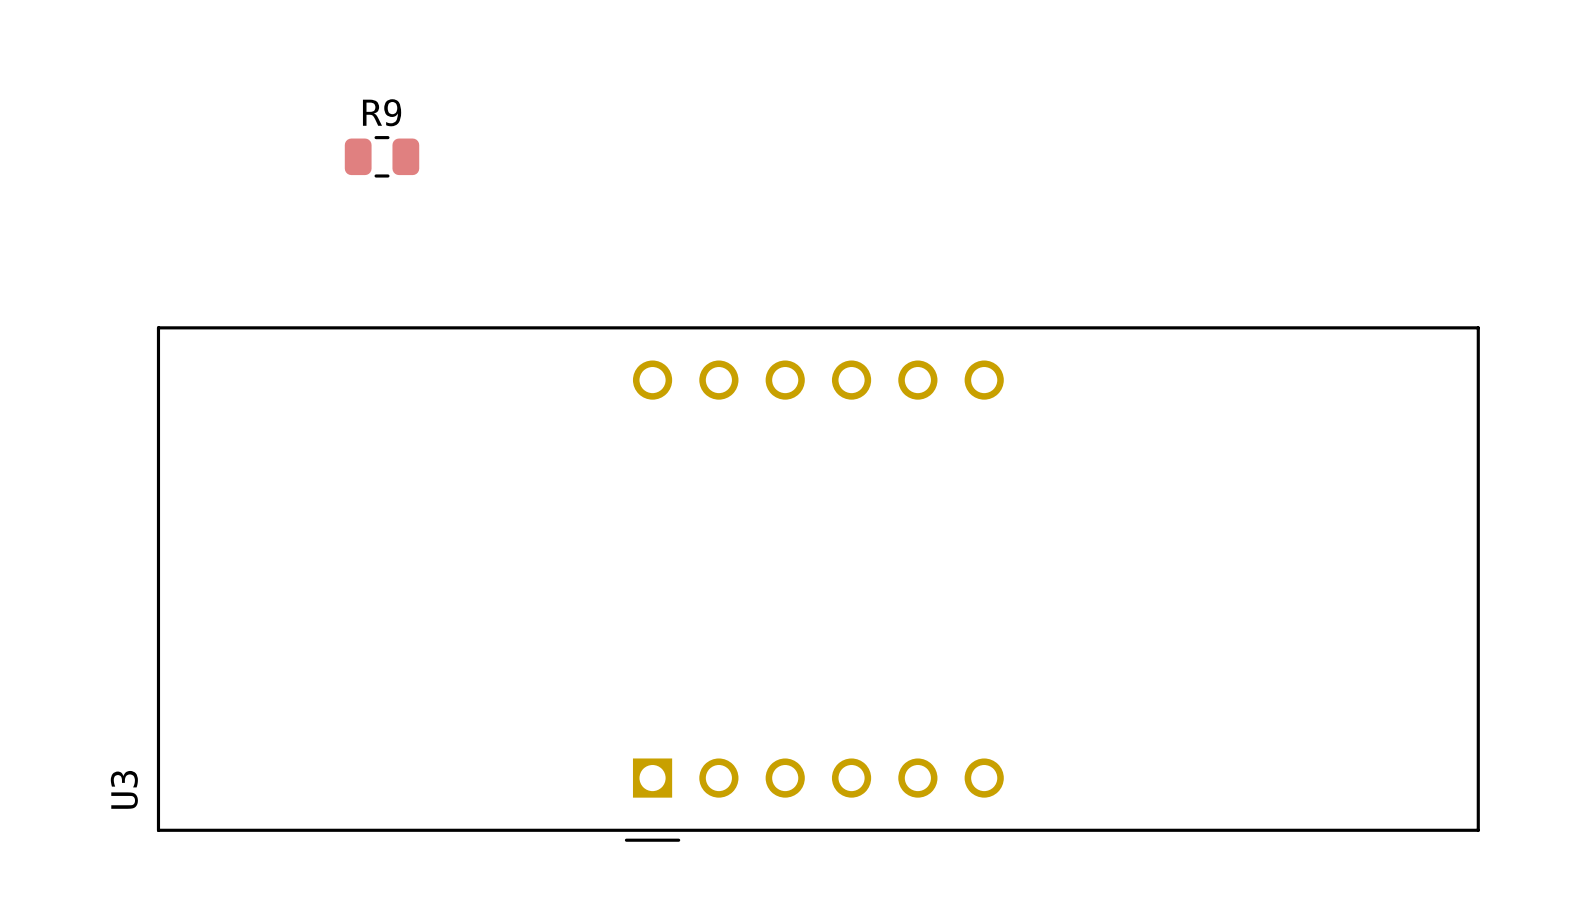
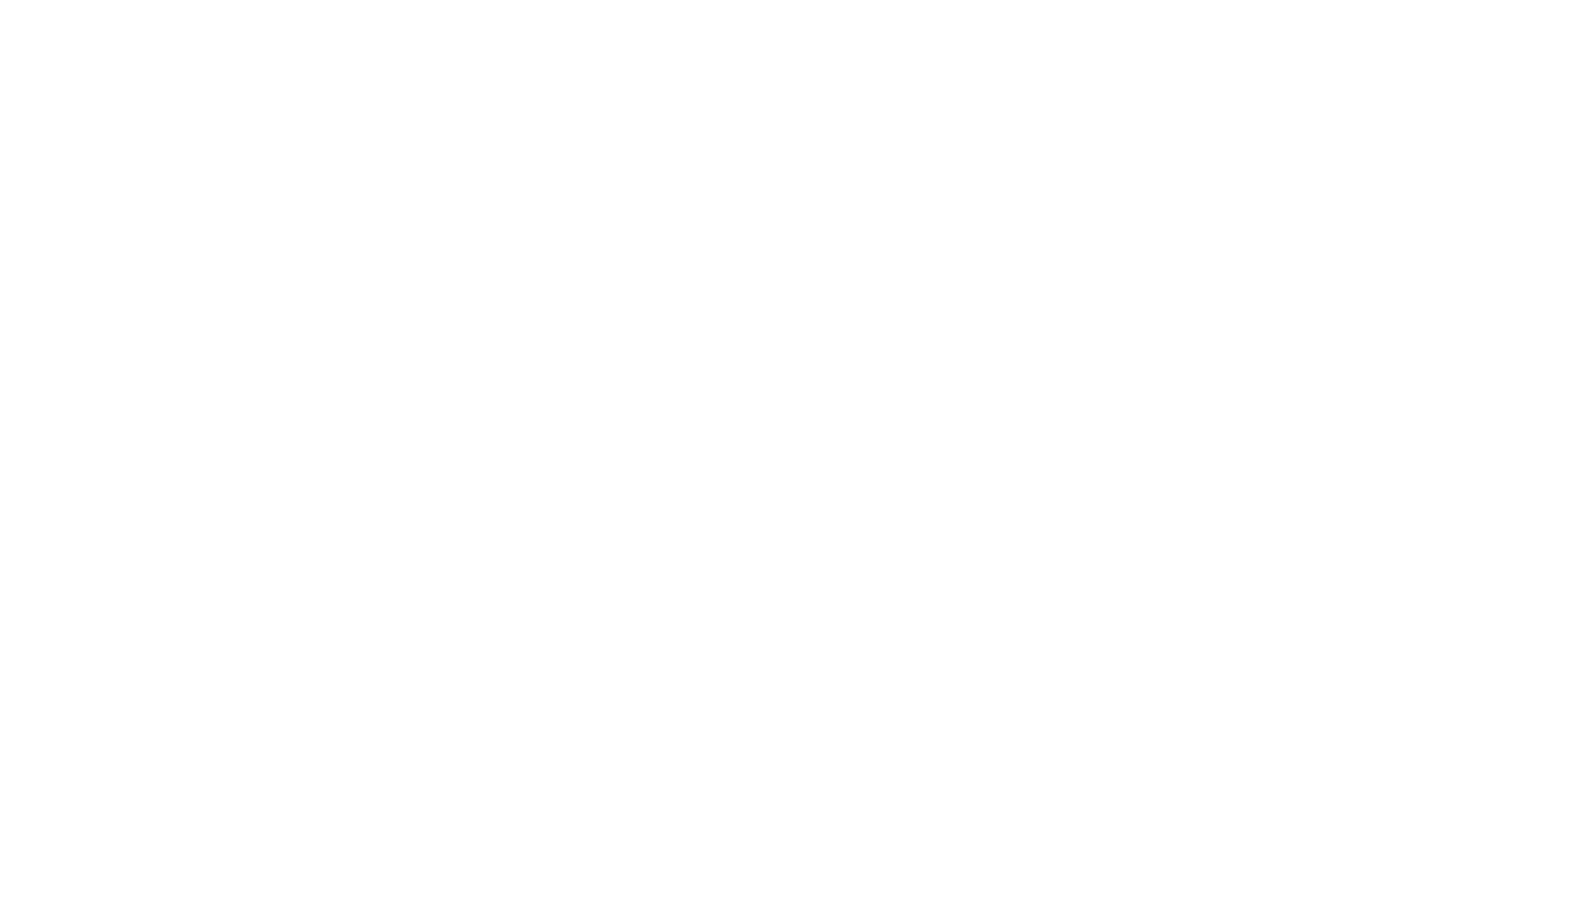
R9: (382, 156) -> none
U3: (818, 584) -> none

